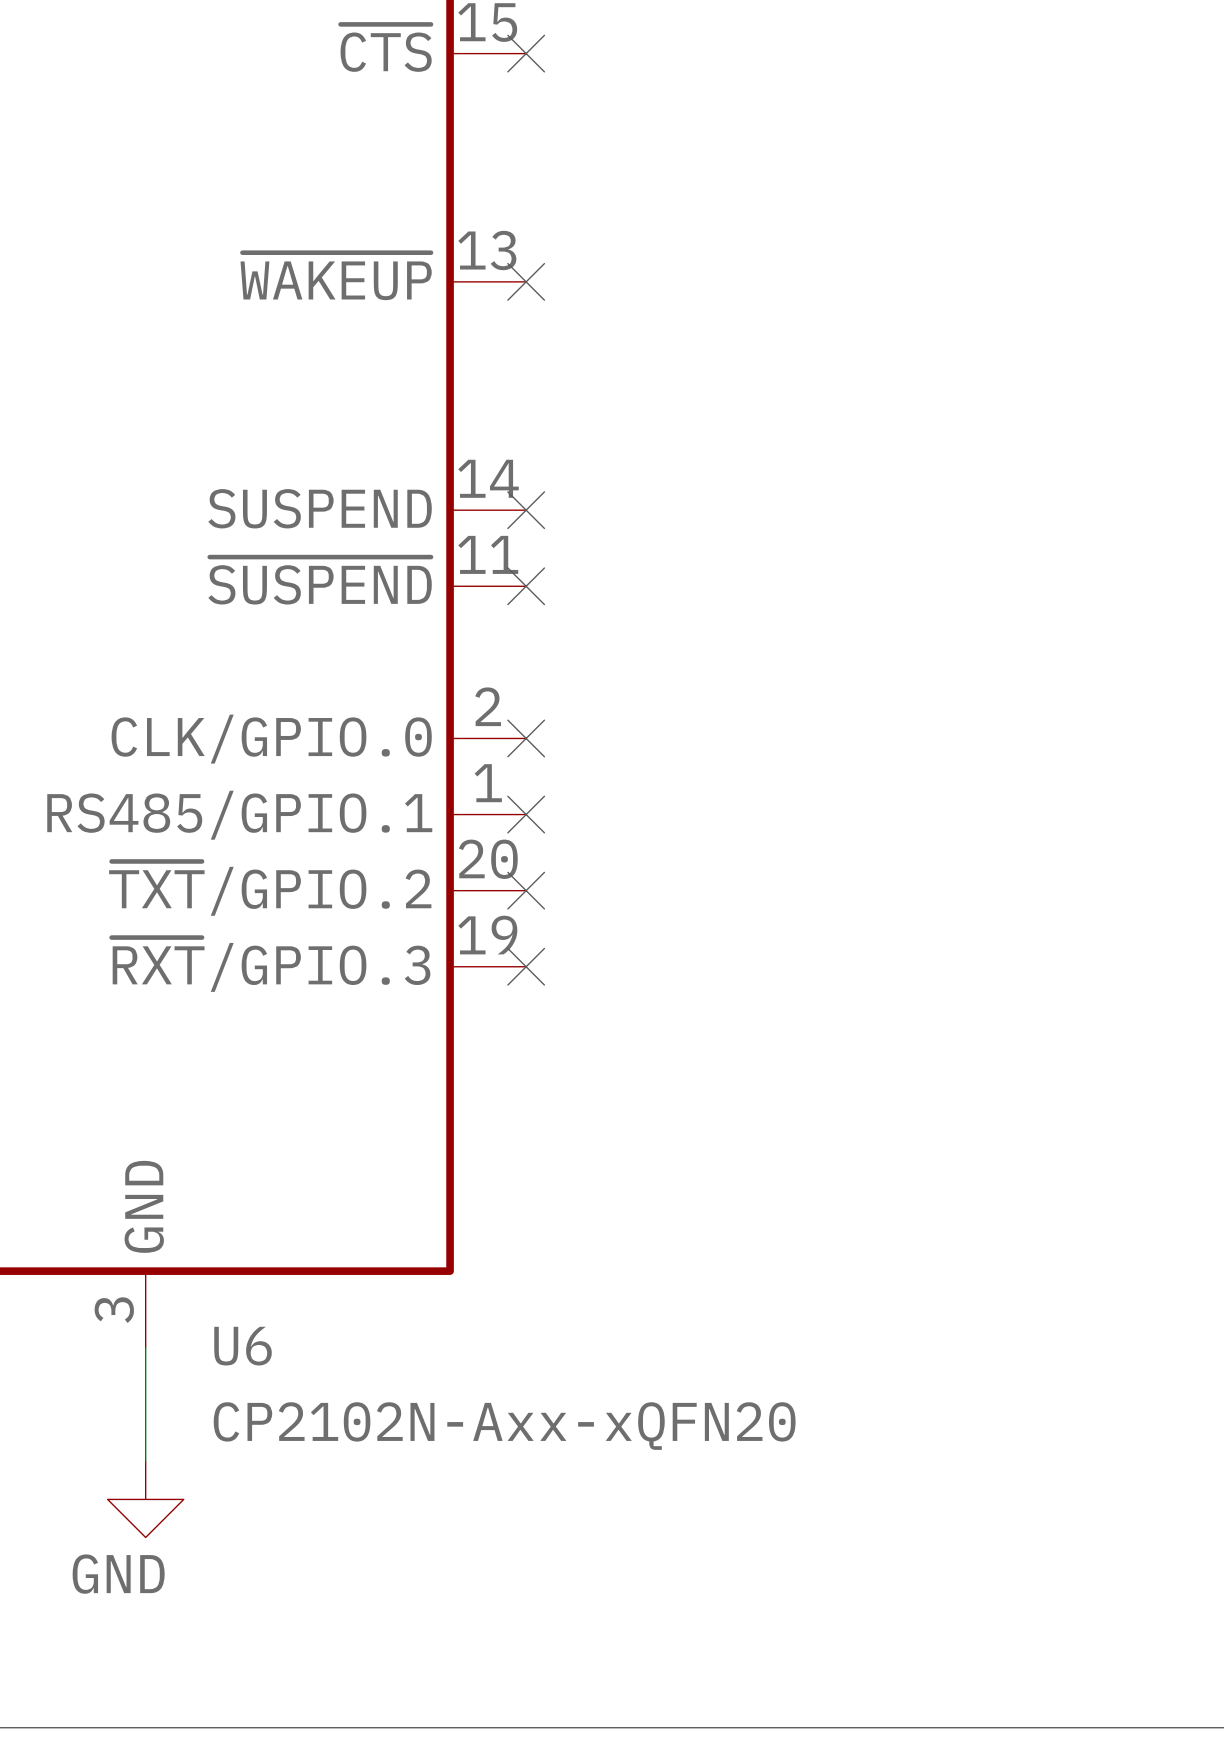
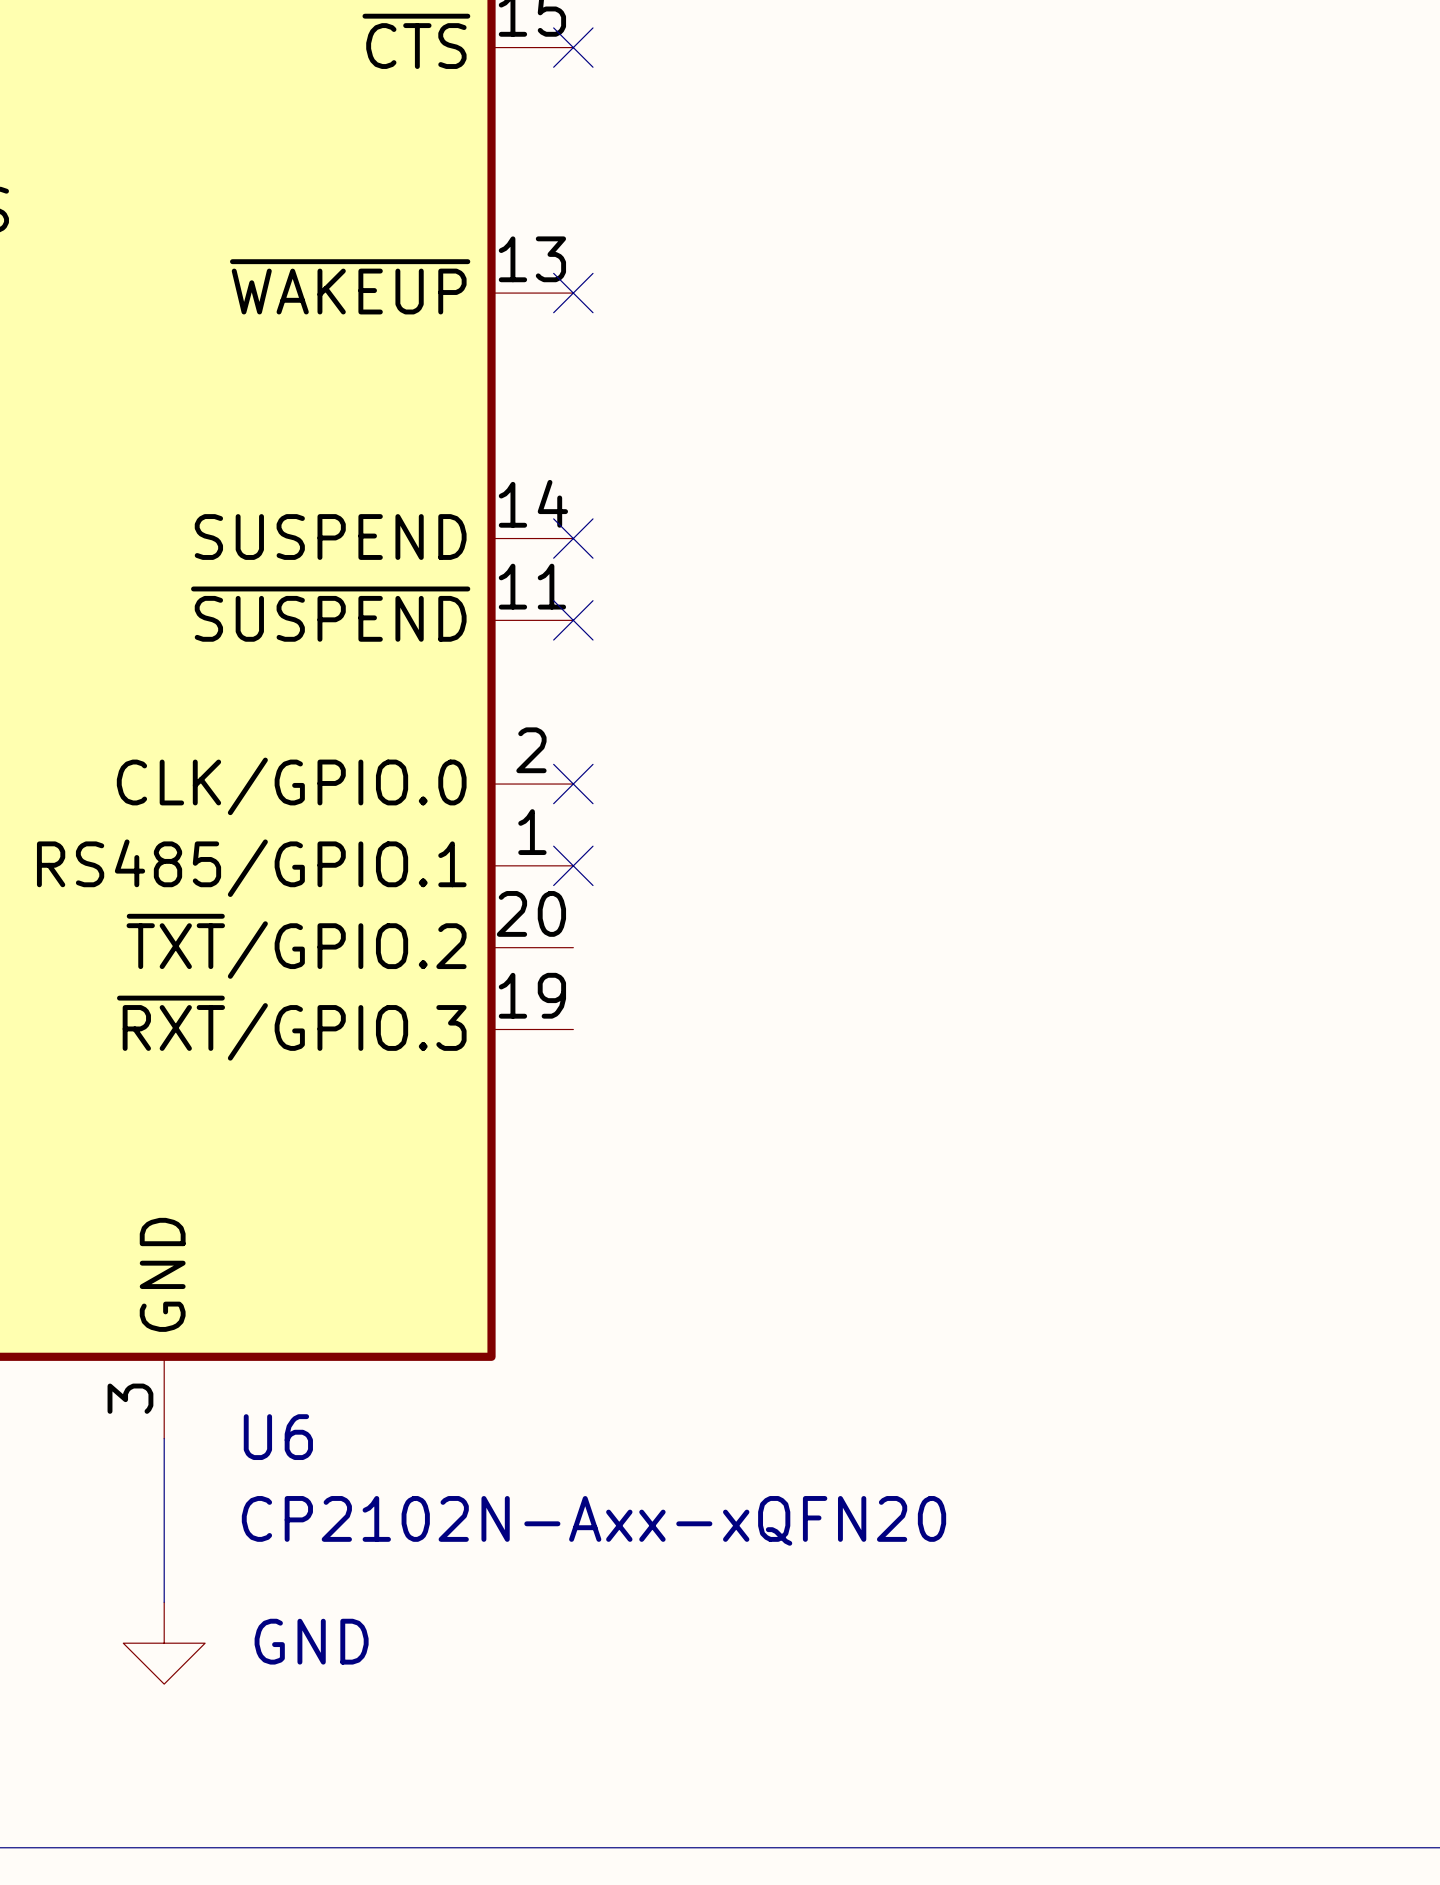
no-connect mark: (526, 890) -> none
no-connect mark: (526, 966) -> none
power symbol position: GND (145, 1499) -> GND (164, 1643)
power symbol text position: GND (118, 1574) -> GND (311, 1641)

